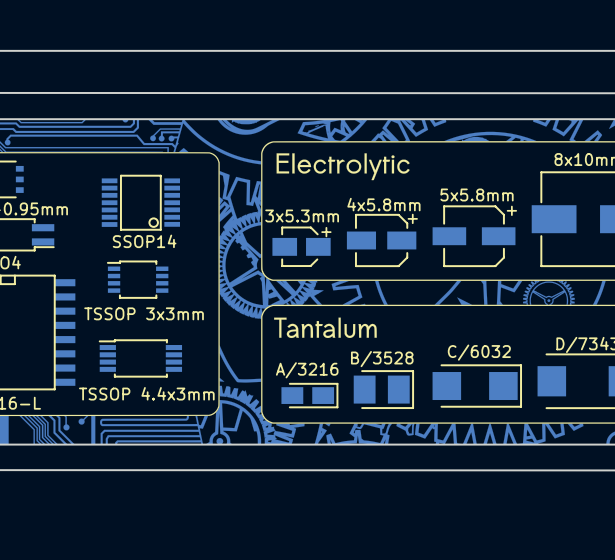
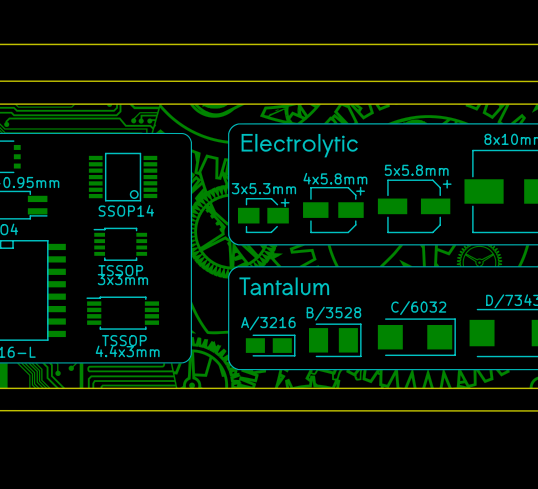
part value: TSSOP 3x3mm (144, 313) -> TSSOP (120, 270)
text: none -> 3x3mm (122, 279)
part value: TSSOP 4.4x3mm (146, 393) -> TSSOP (124, 340)
text: none -> 4.4x3mm (127, 351)

